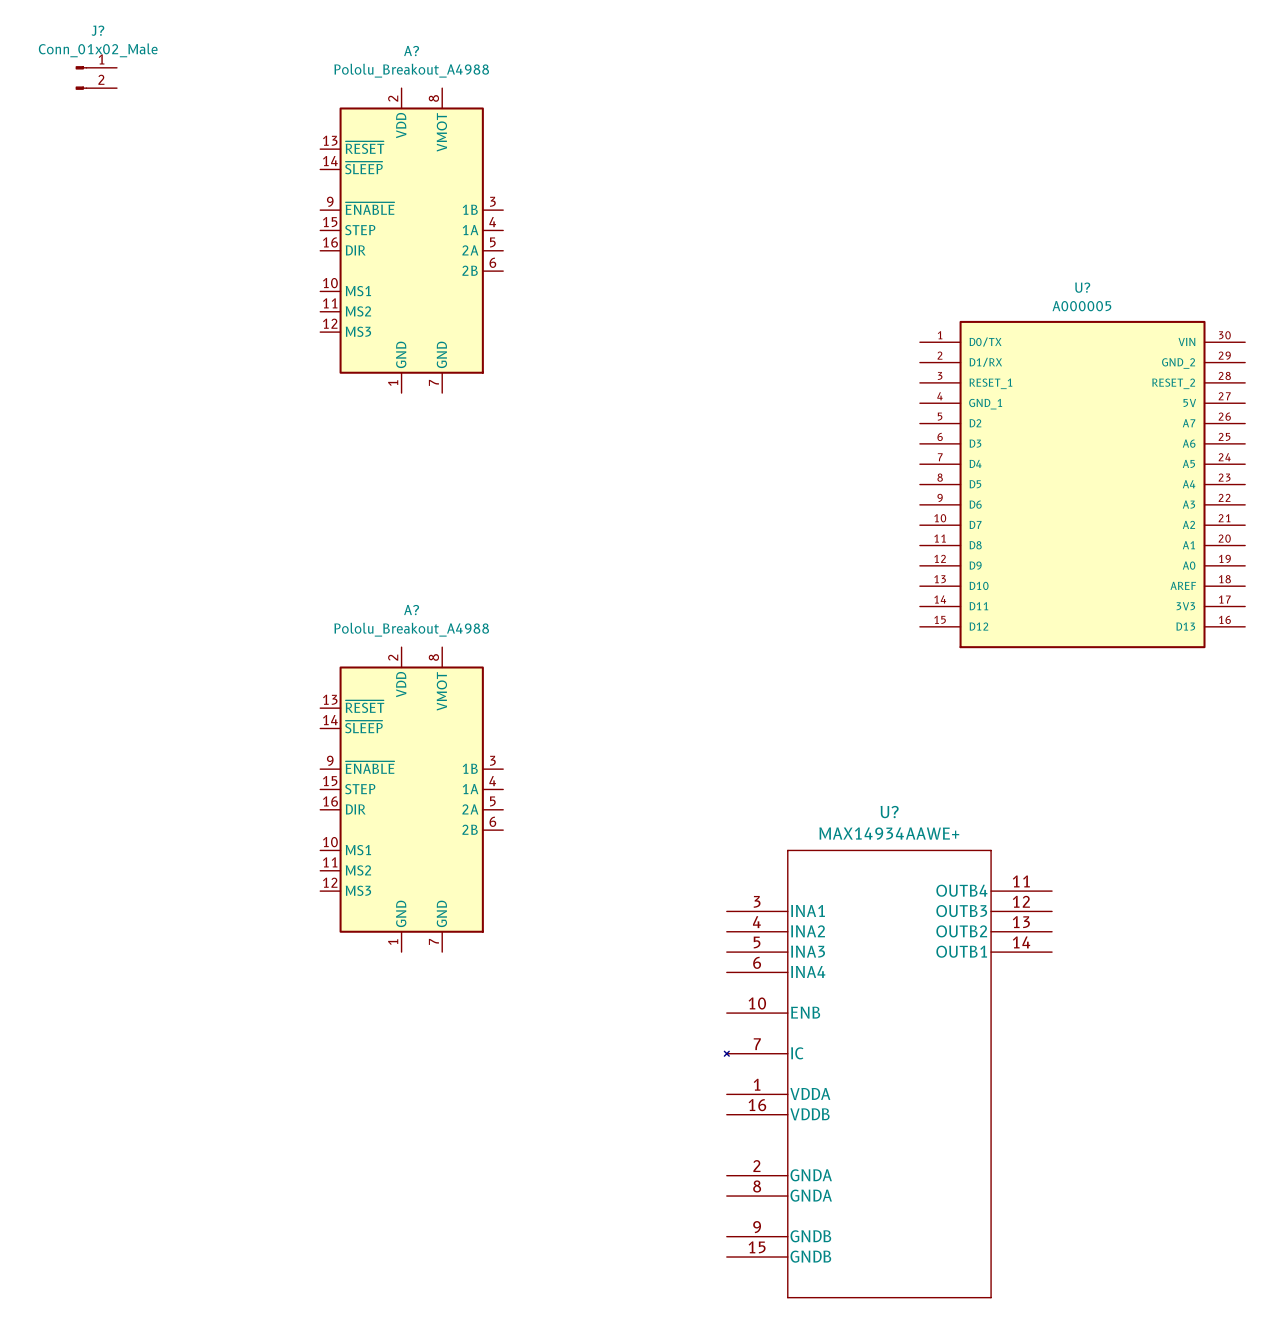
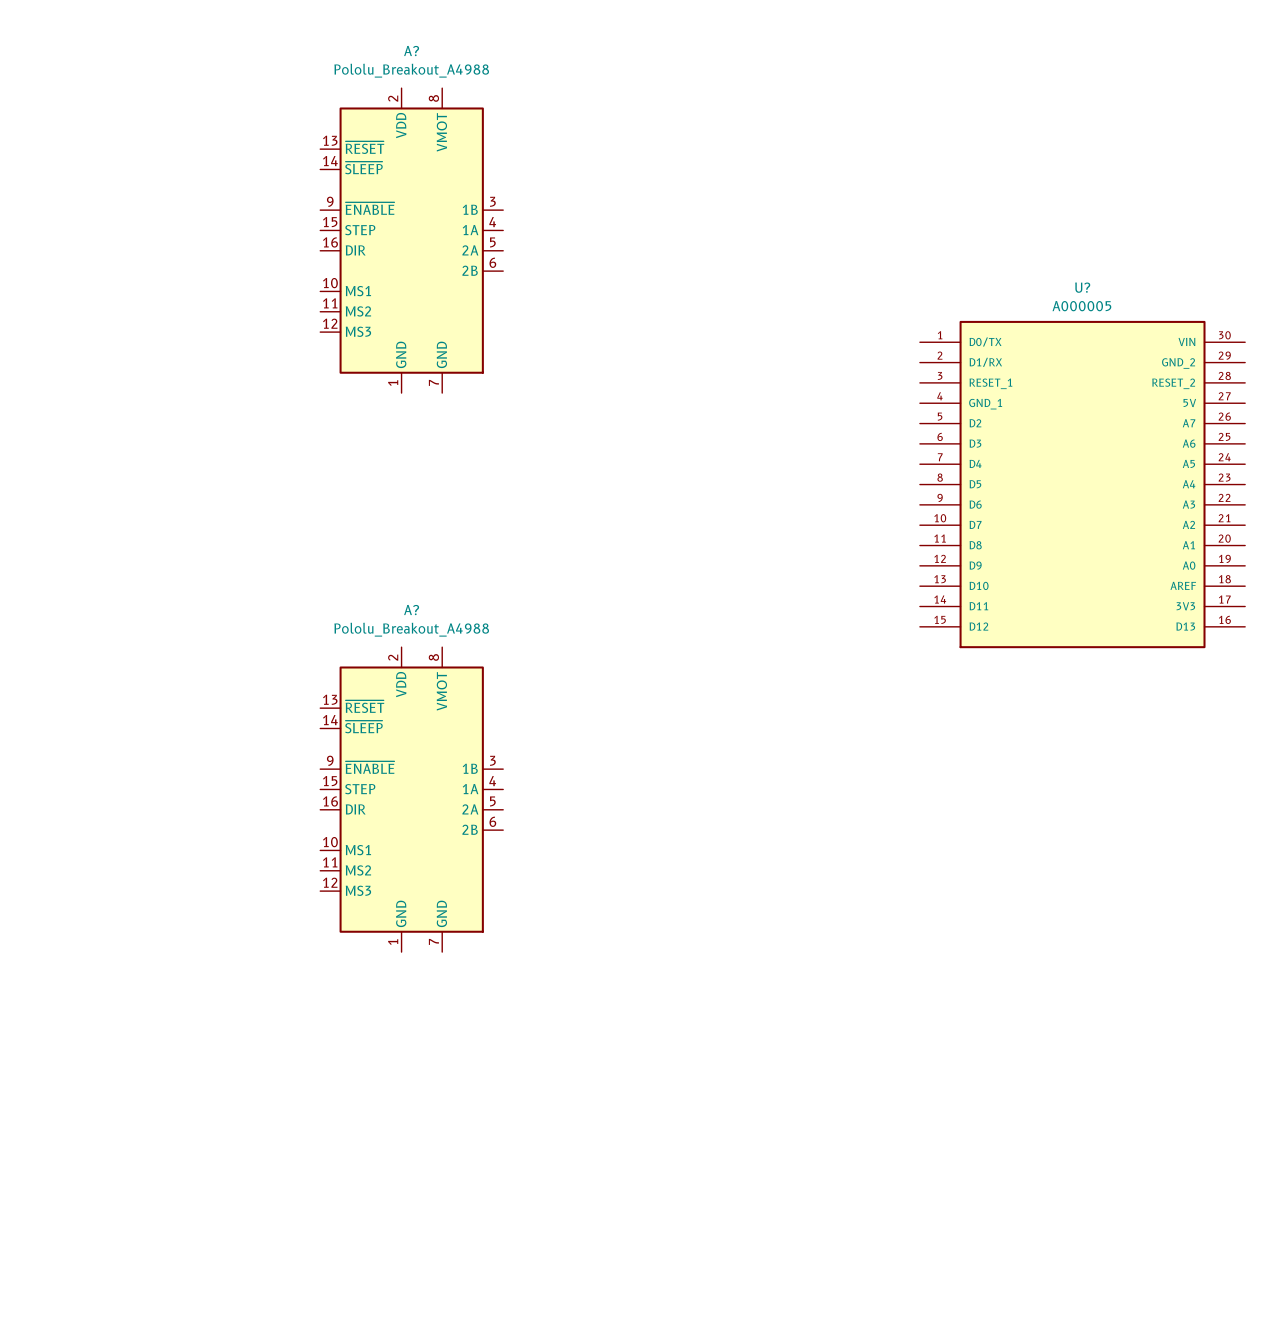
J?: Conn_01x02_Male (96, 77) -> none
U?: MAX14934AAWE+ (888, 1074) -> none

